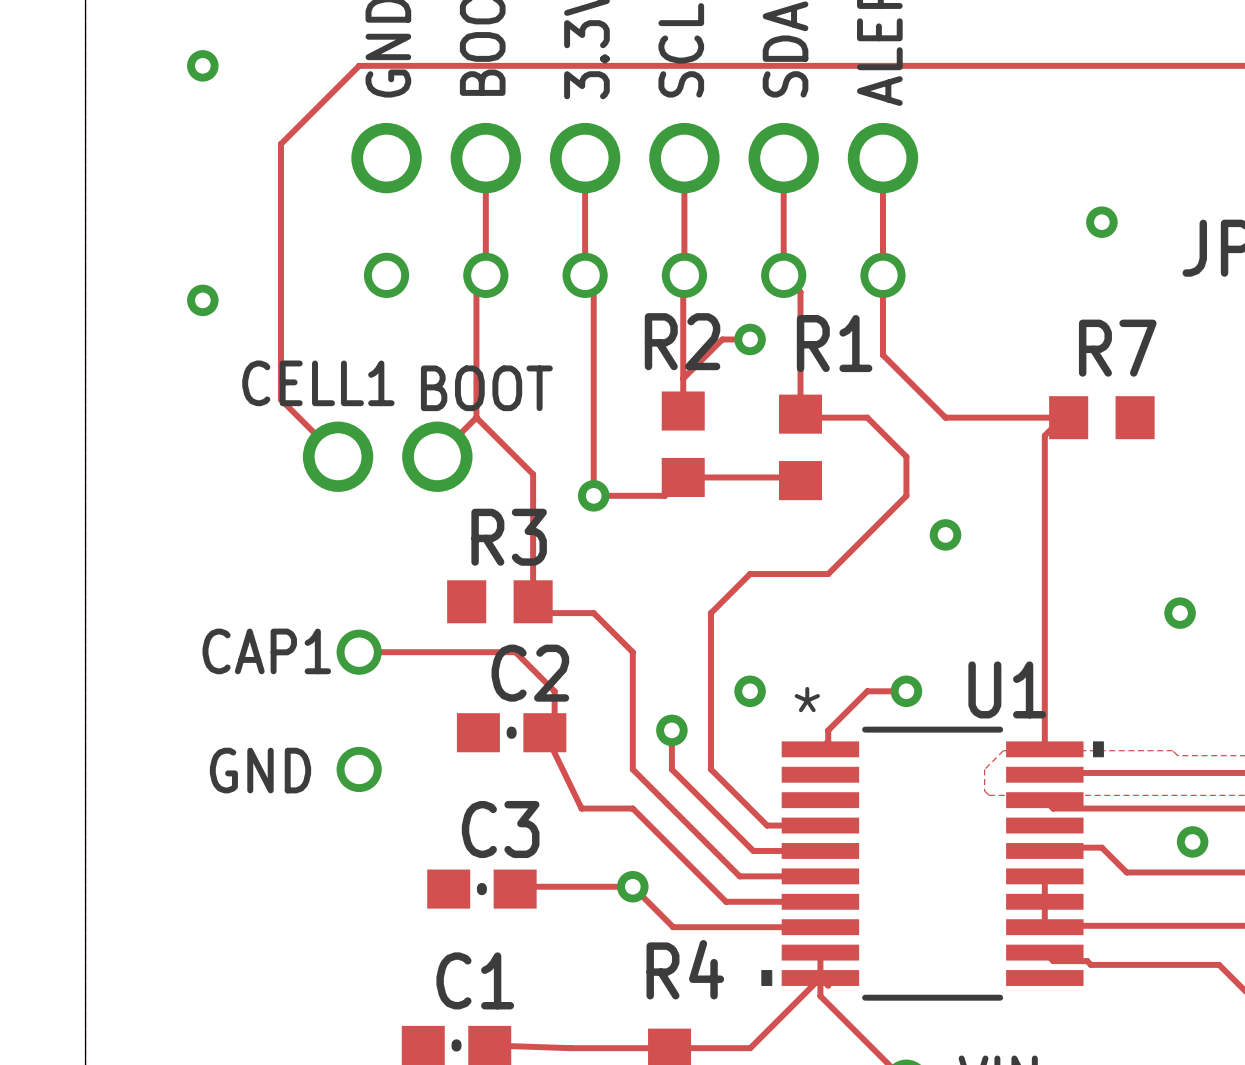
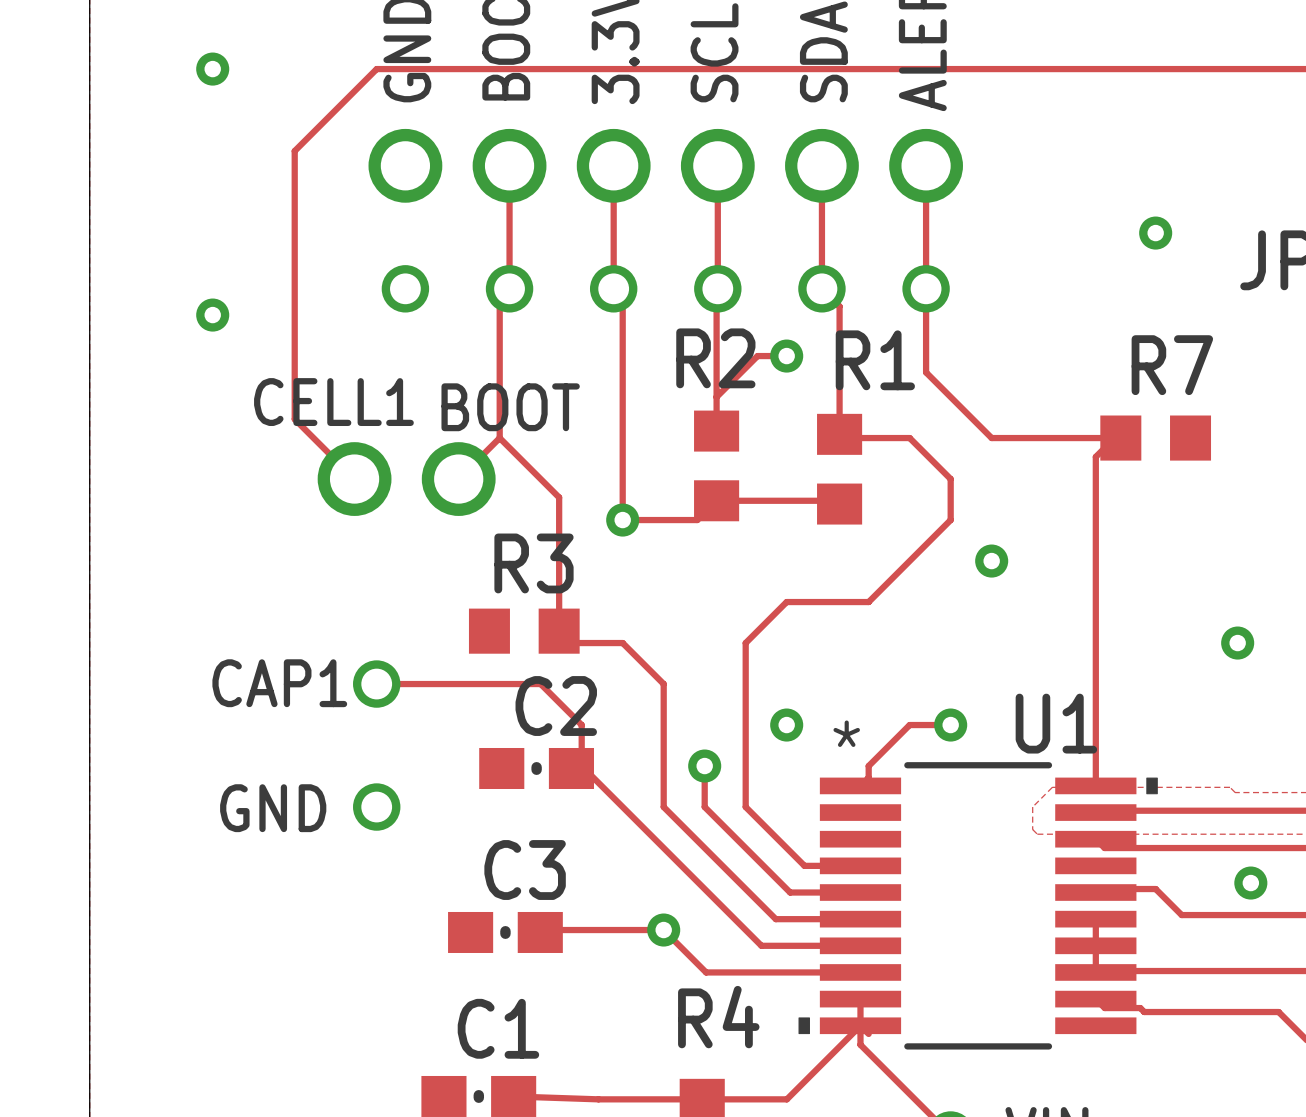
track: (544, 732) (581, 808) (632, 808) -> (577, 762) (663, 848)

